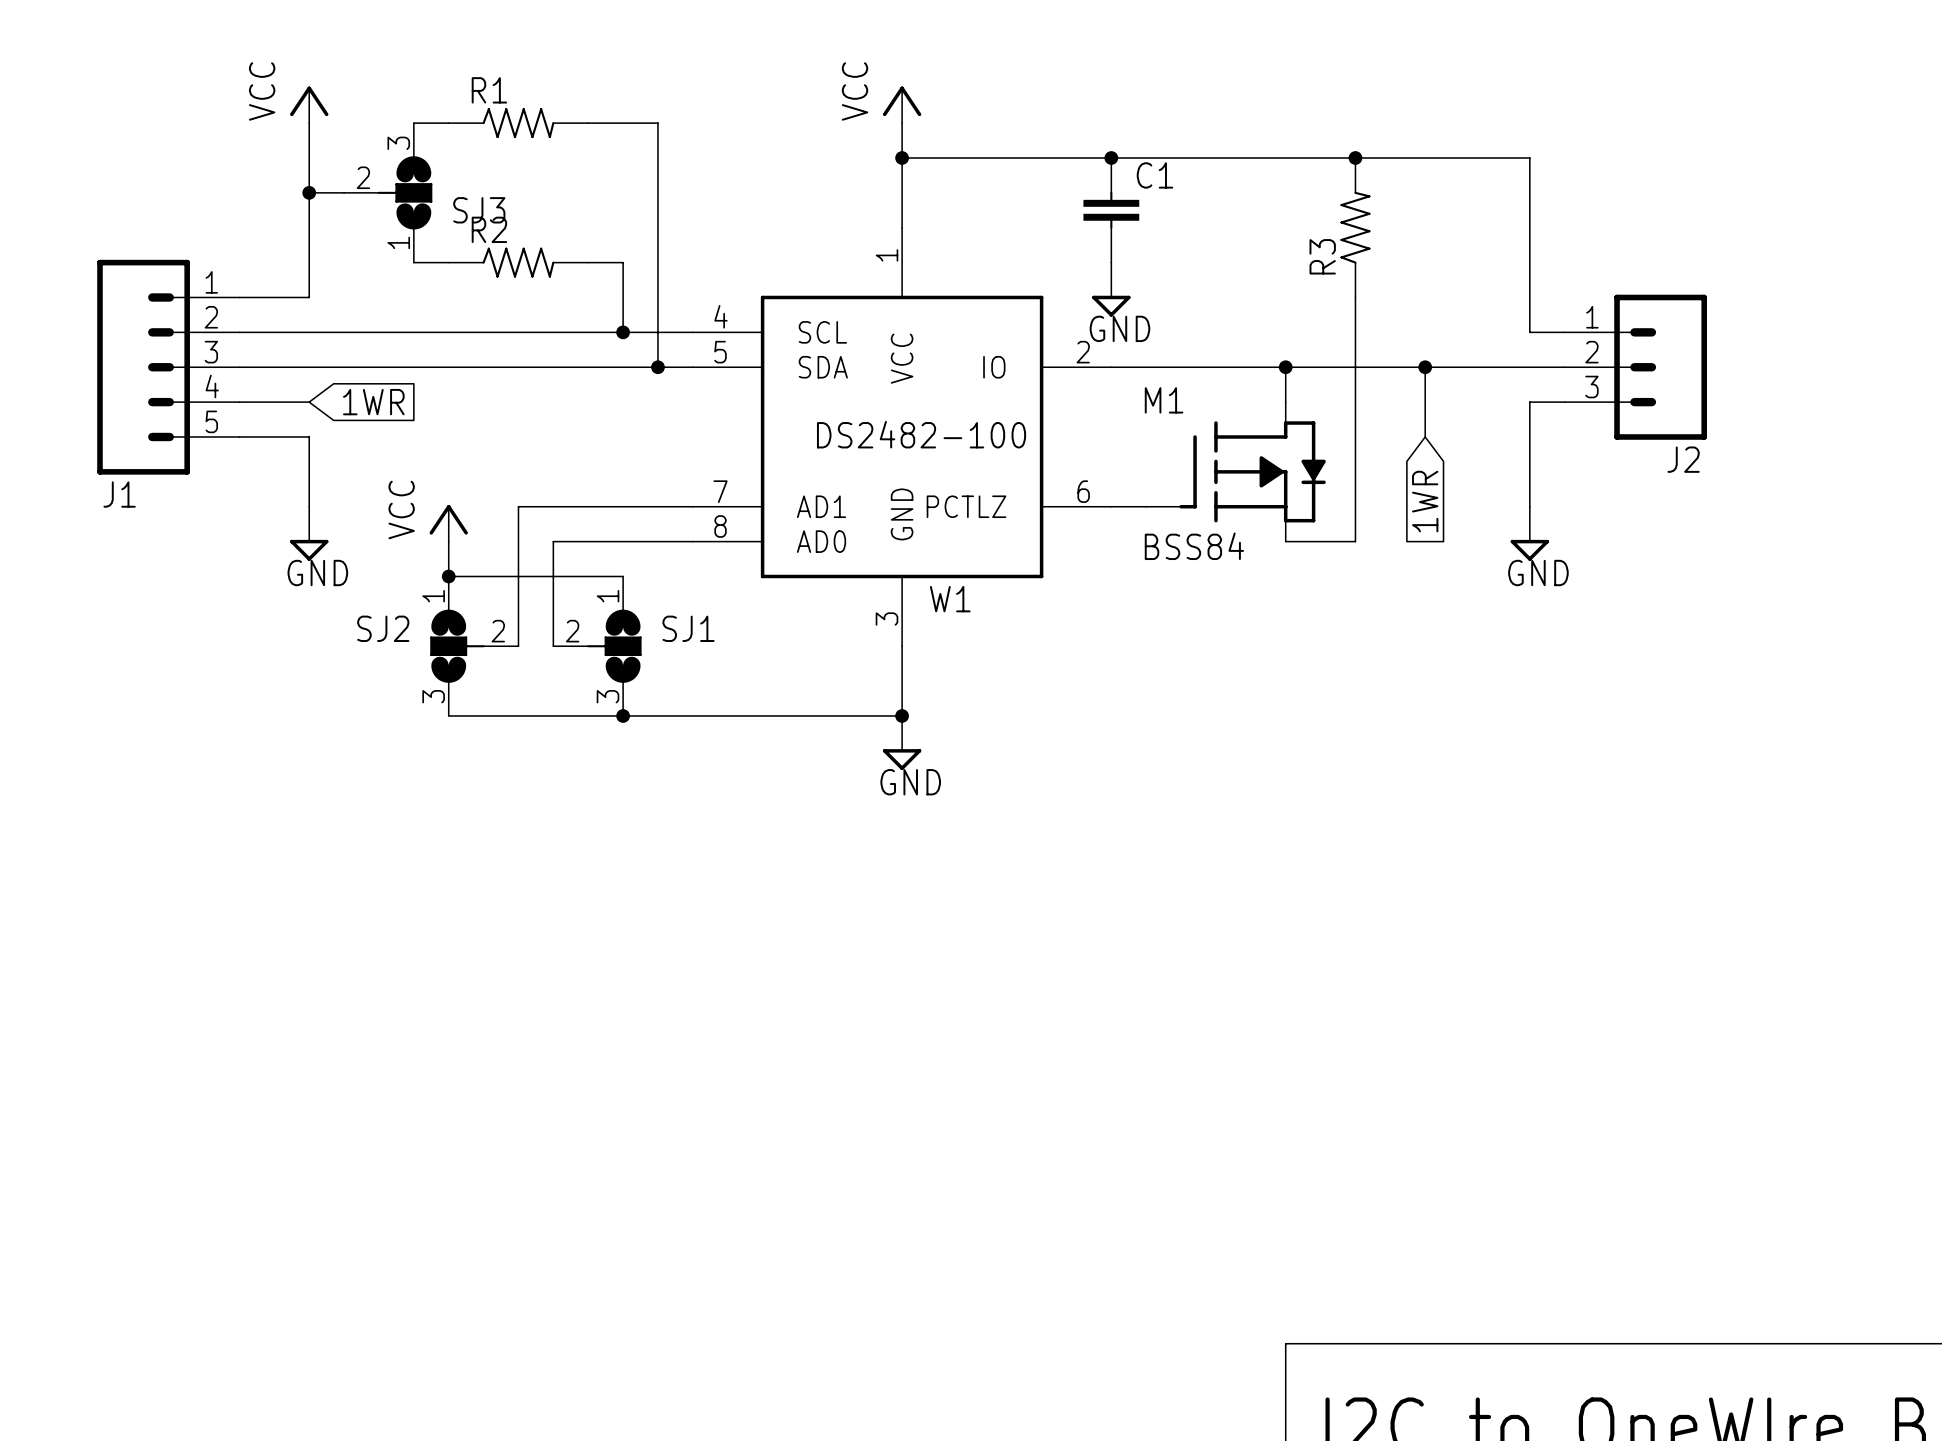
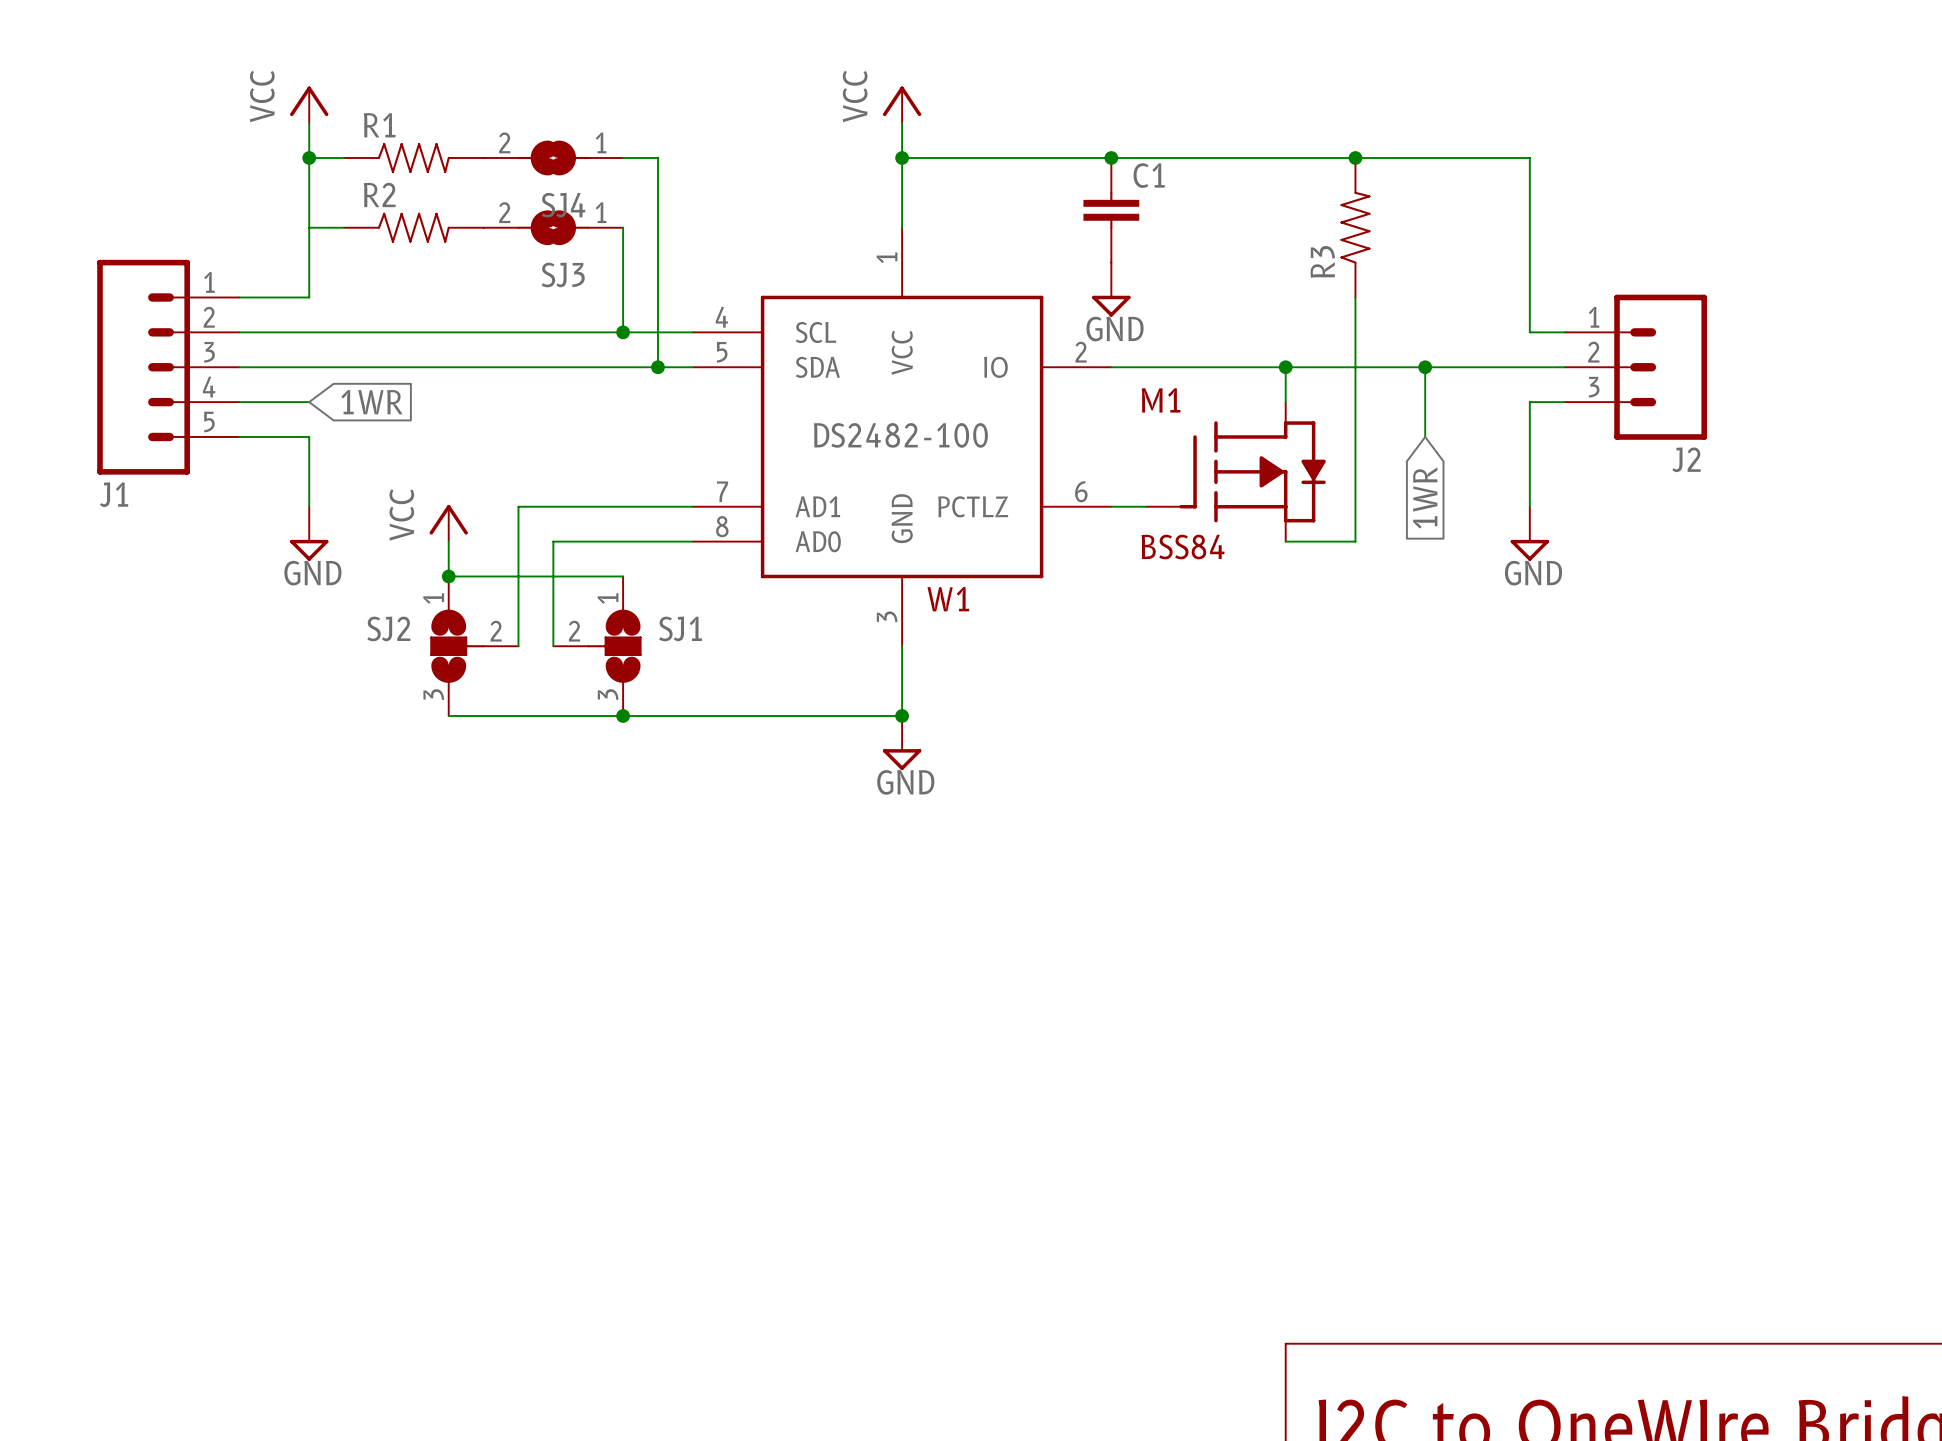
SJ3 symbol: [344, 123, 433, 263] -> [483, 210, 624, 246]
wire: (413, 123) (448, 123) -> (309, 157) (344, 157)
R1 position: (518, 123) -> (413, 157)
wire: (588, 123) (657, 123) (657, 157) -> (623, 157) (657, 157)
SJ4: none -> (553, 157)
wire: (309, 192) (344, 192) -> (309, 227) (344, 227)
junction position: (309, 192) -> (309, 157)
SJ3 name position: SJ3 (479, 210) -> SJ3 (563, 274)
wire: (413, 262) (448, 262) -> none
R2 position: (518, 262) -> (413, 227)
wire: (588, 262) (623, 262) -> (623, 227) (623, 262)

